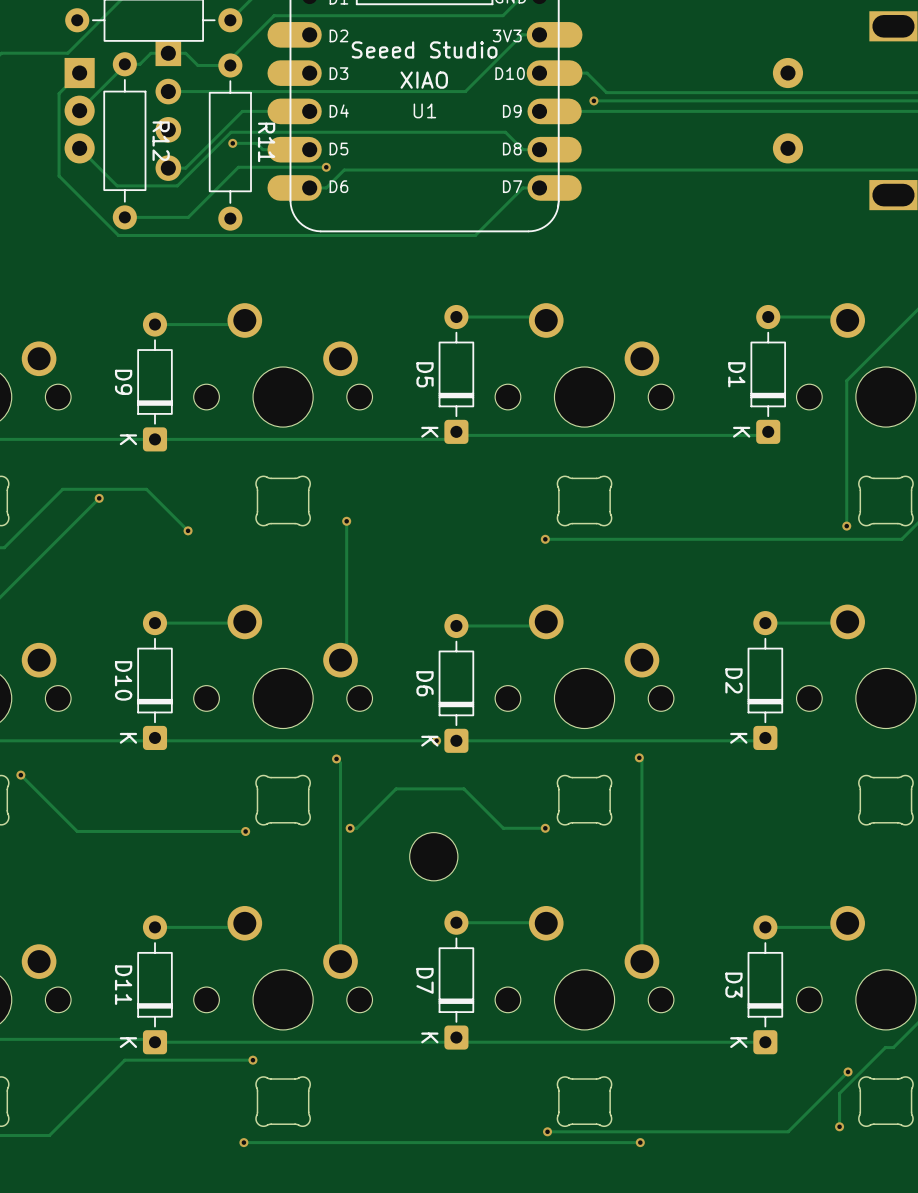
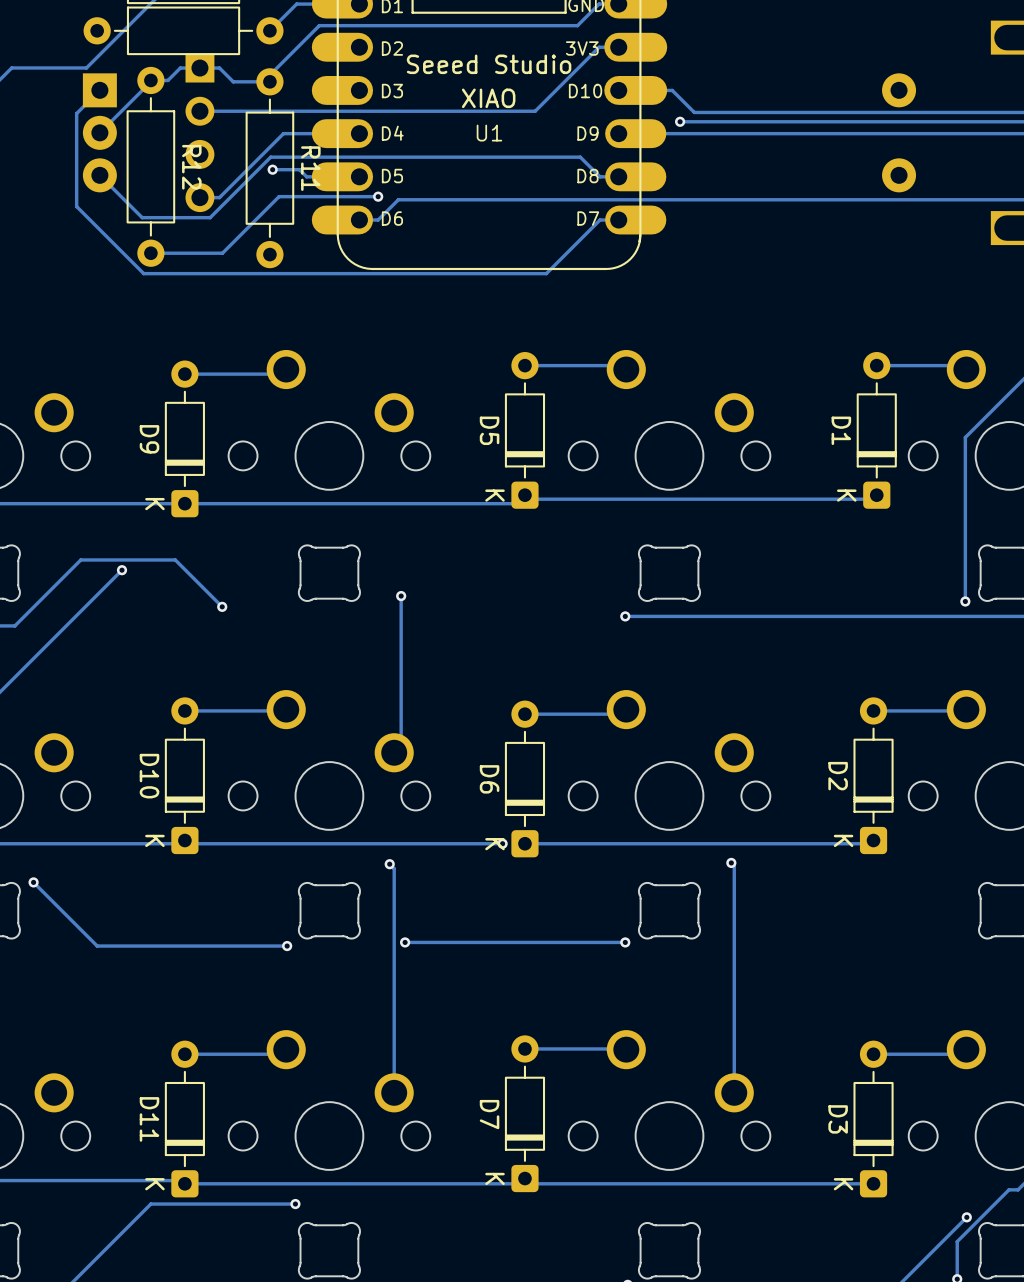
track: (503, 828) (463, 788) (396, 788) (356, 828) -> (577, 942) (412, 942)
part: (433, 856) -> none

